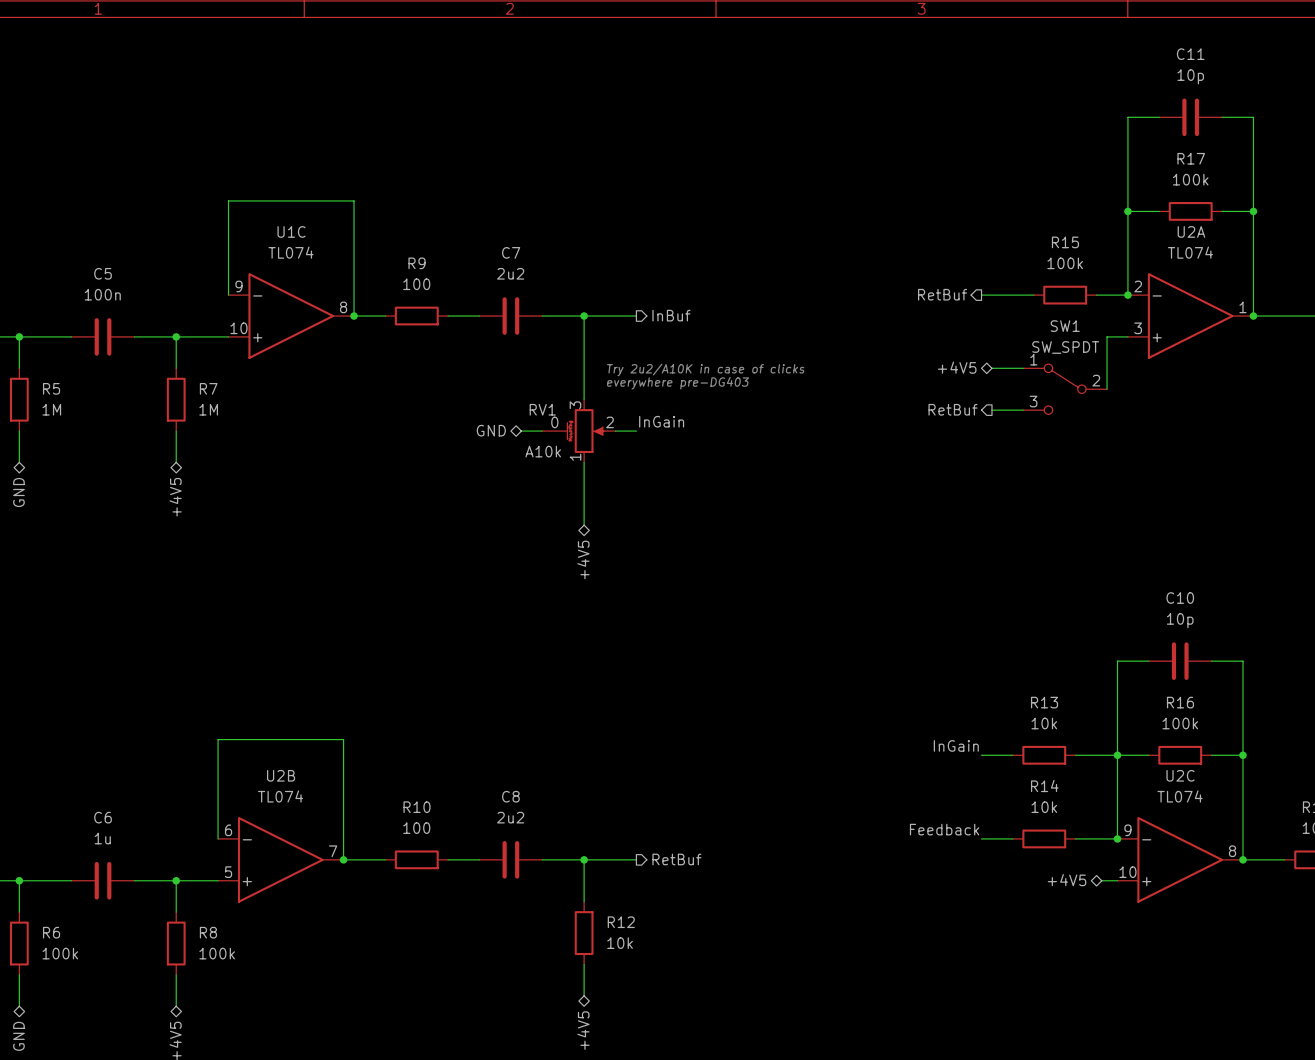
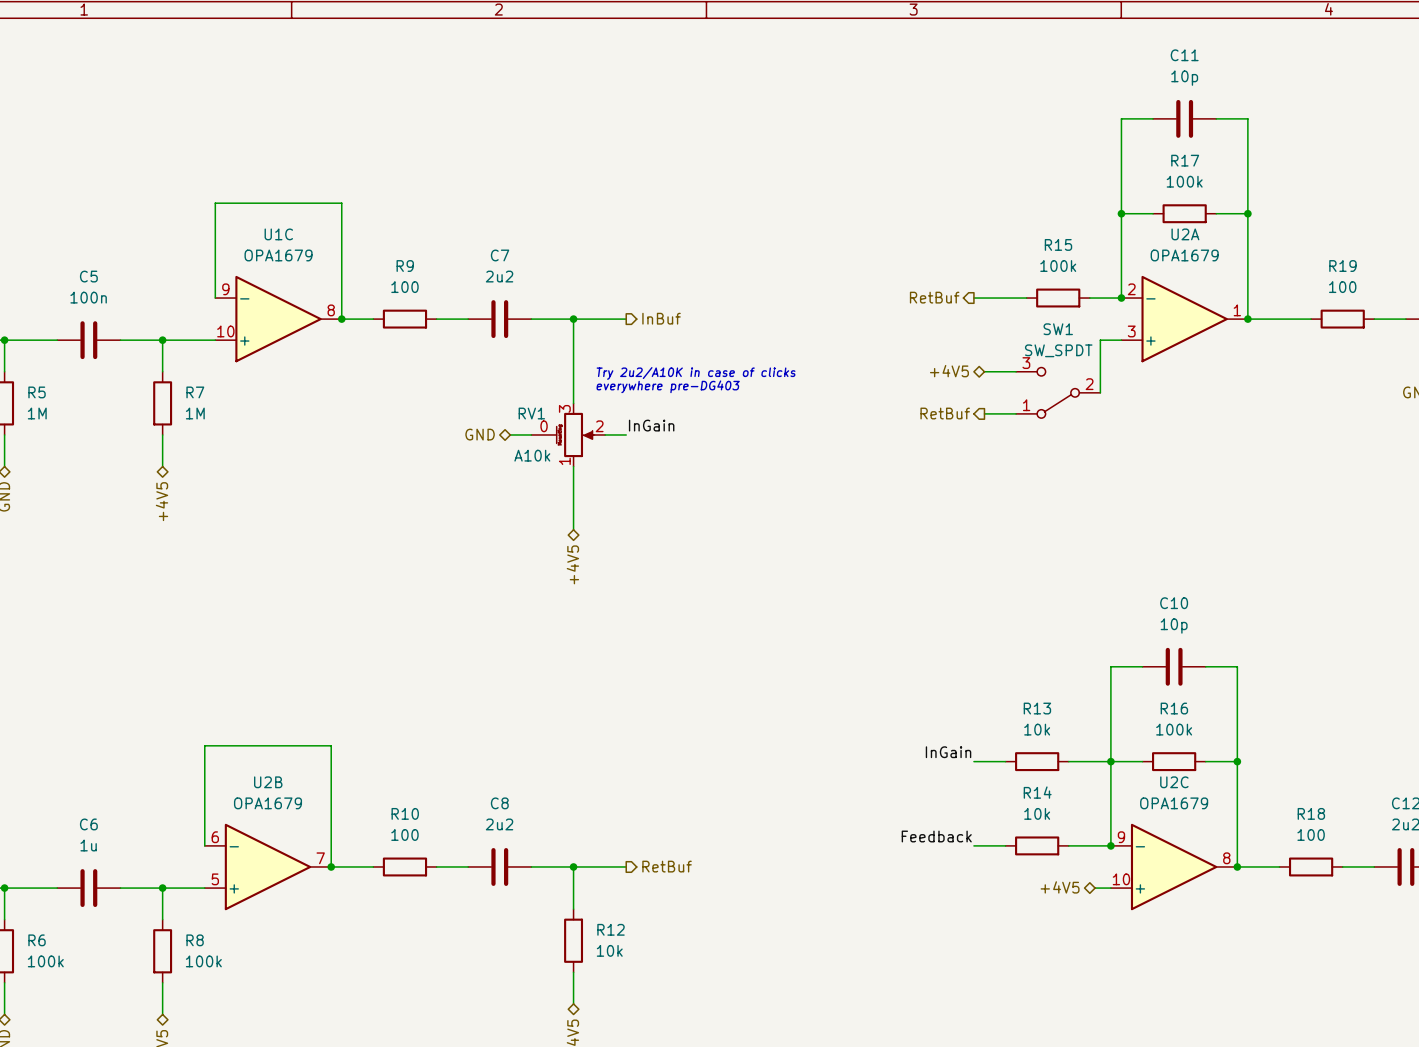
U1C value: TL074 (291, 252) -> OPA1679 (278, 255)
U2A value: TL074 (1190, 252) -> OPA1679 (1184, 255)
SW1 flip: as is (1065, 389) -> up-down (1058, 392)
U2B value: TL074 (280, 796) -> OPA1679 (267, 803)
U2C value: TL074 (1179, 796) -> OPA1679 (1174, 803)

